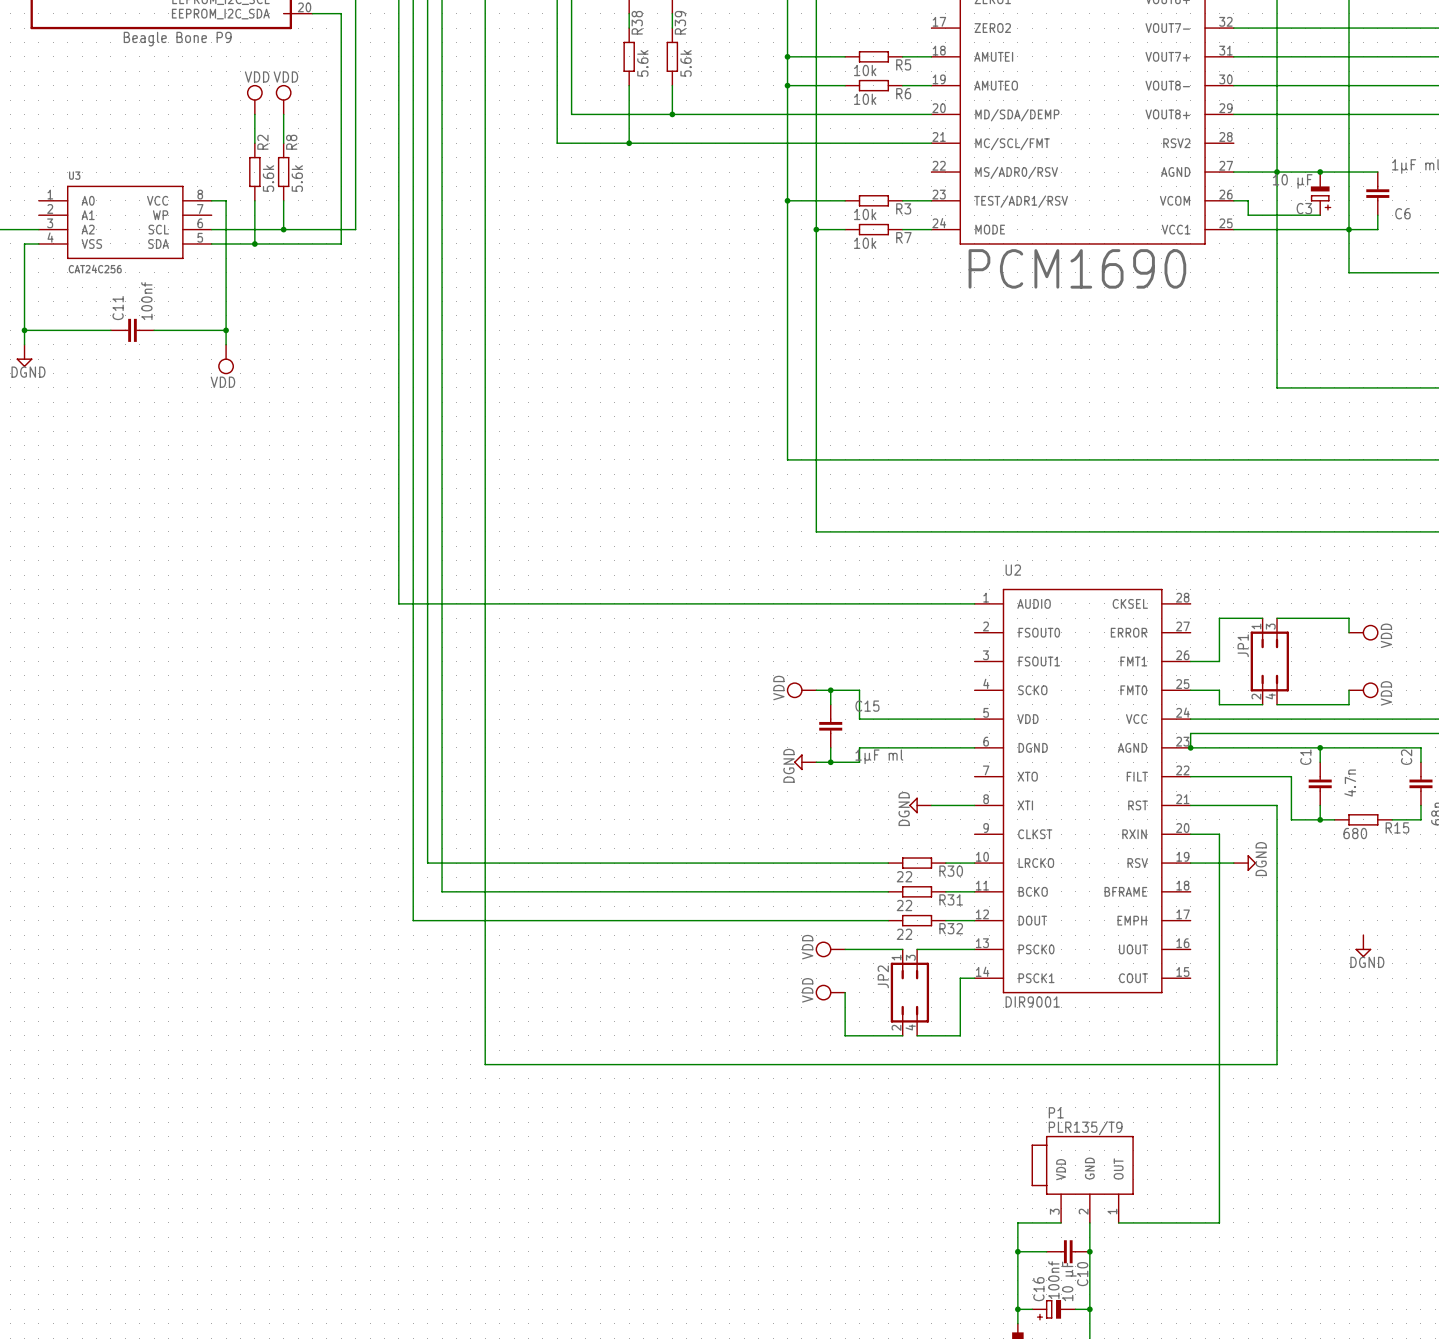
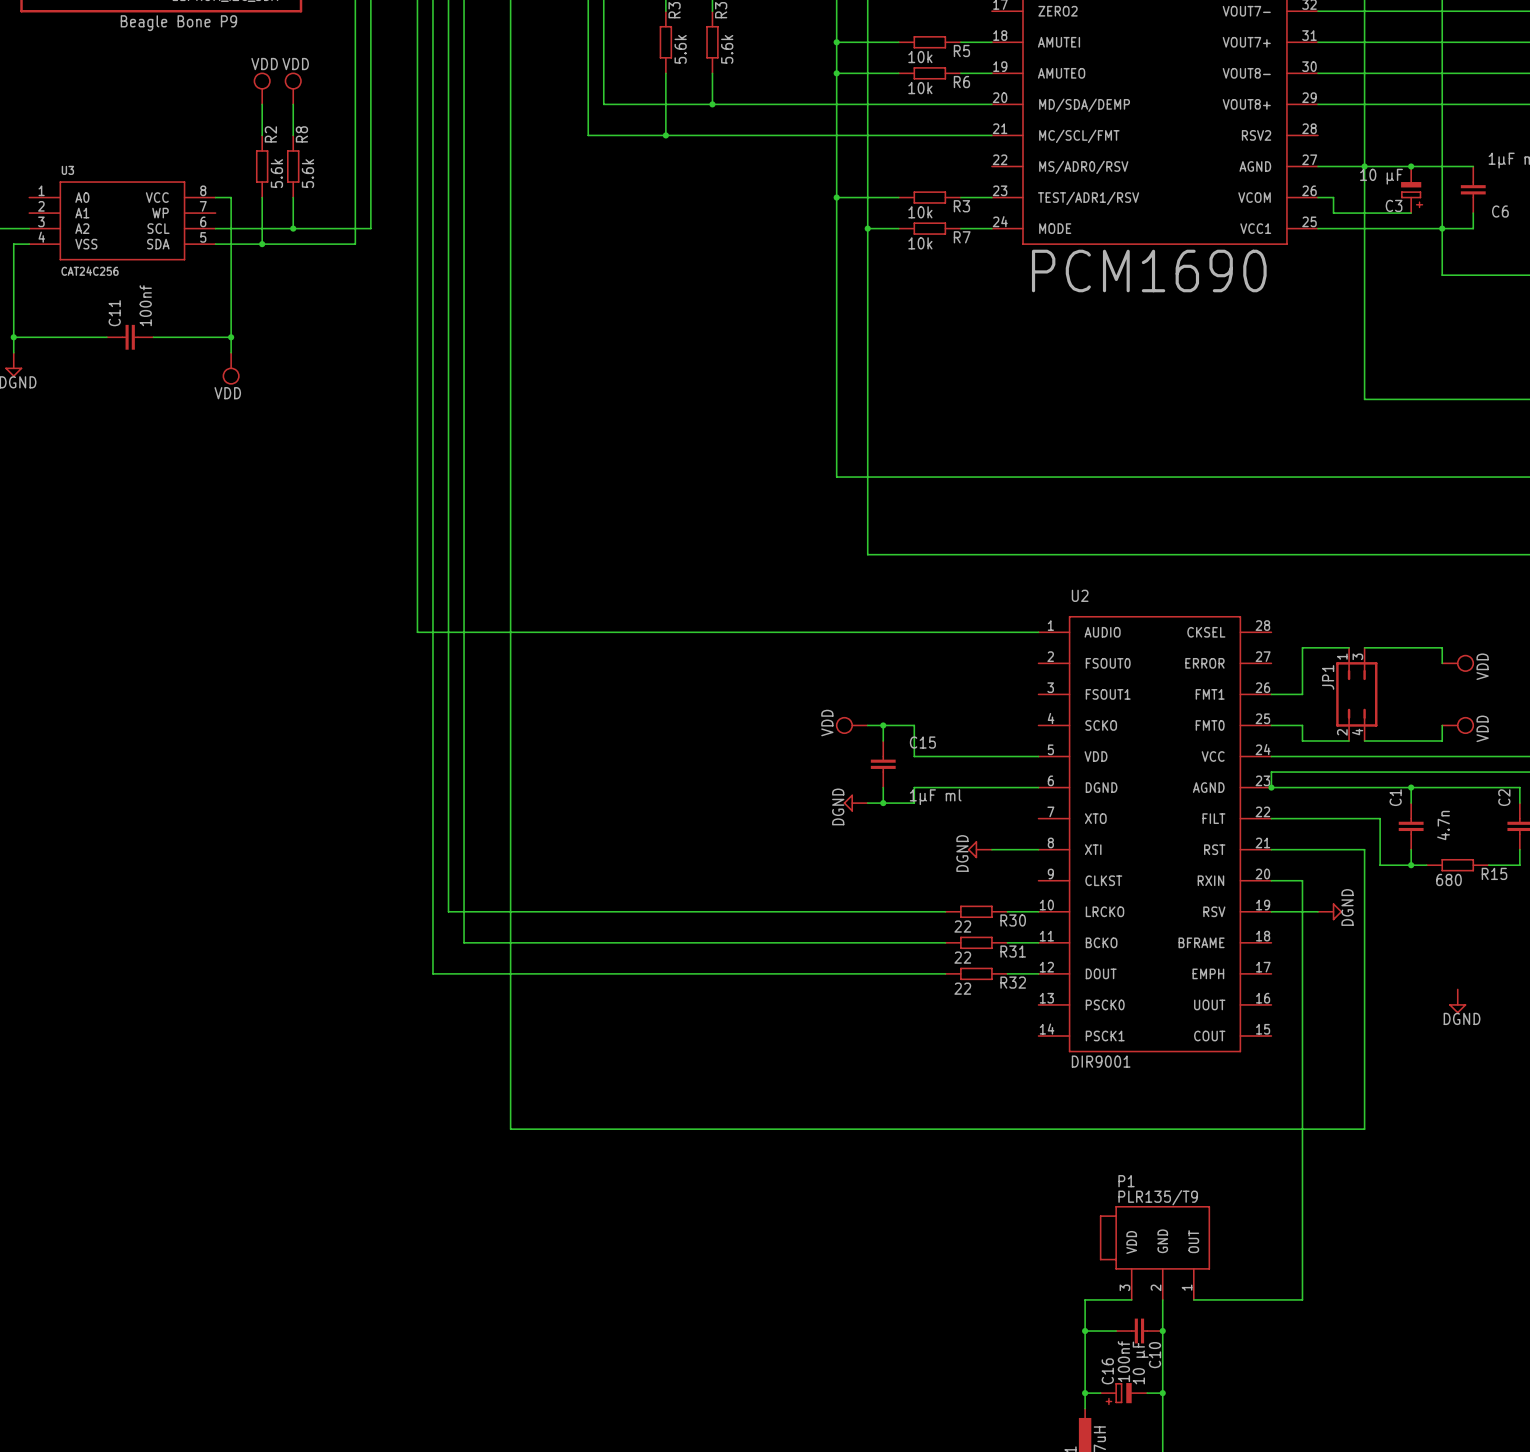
power symbol: VDD (830, 949) -> none
wire: (845, 949) (902, 949) -> none
wire: (917, 949) (974, 949) -> none
wire: (974, 978) (960, 978) (960, 1035) (917, 1035) -> none
power symbol: VDD (830, 992) -> none
wire: (845, 992) (845, 1035) (902, 1035) -> none
JP2: (909, 992) -> none

